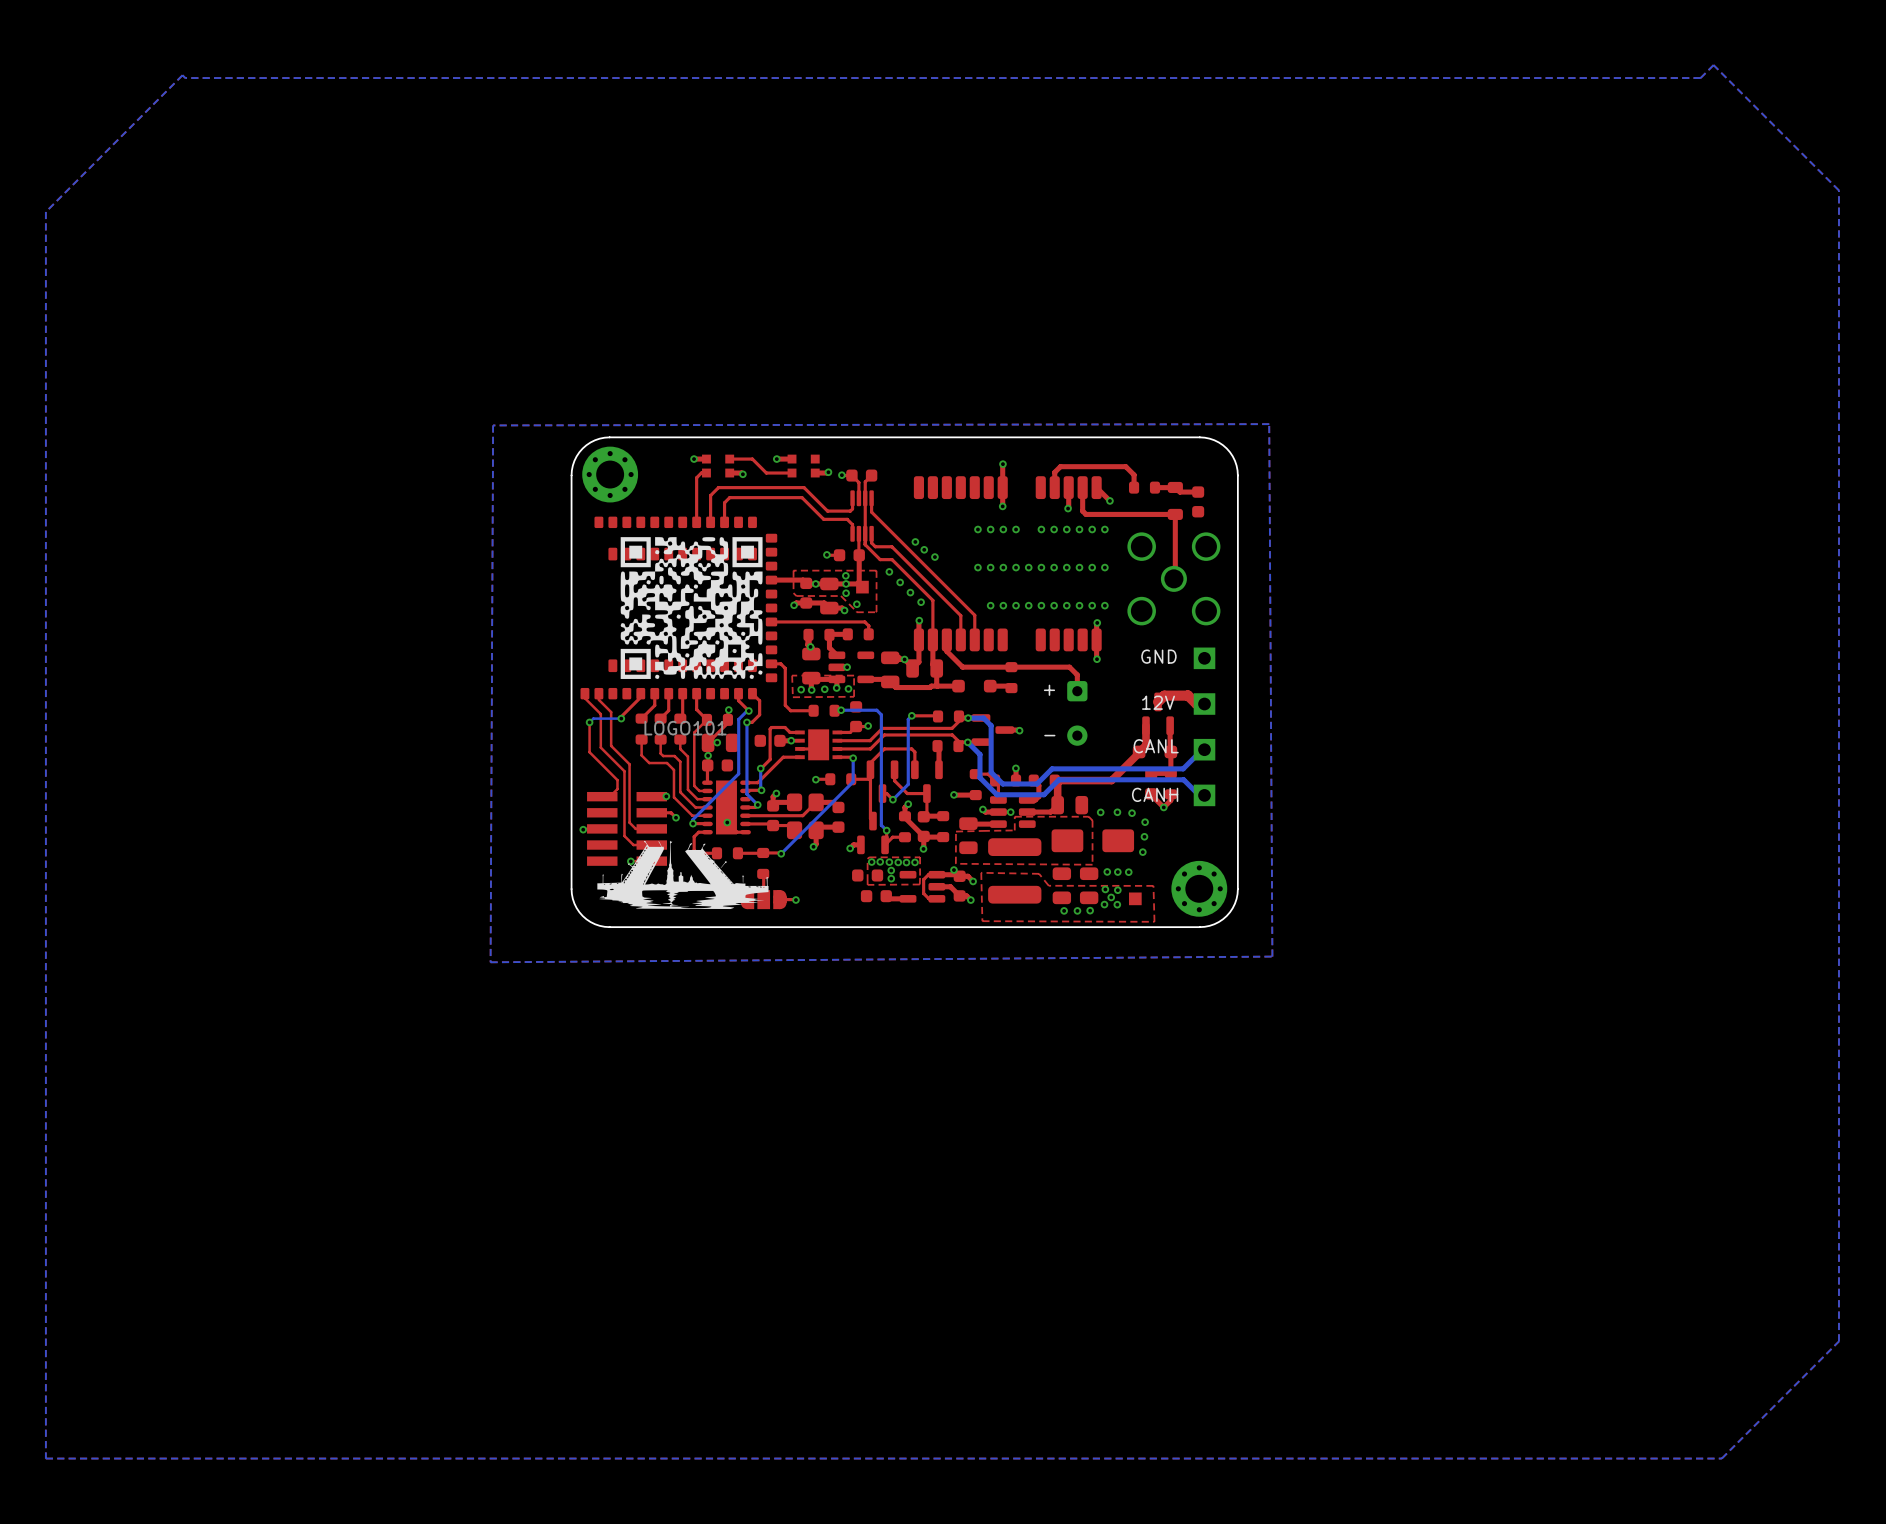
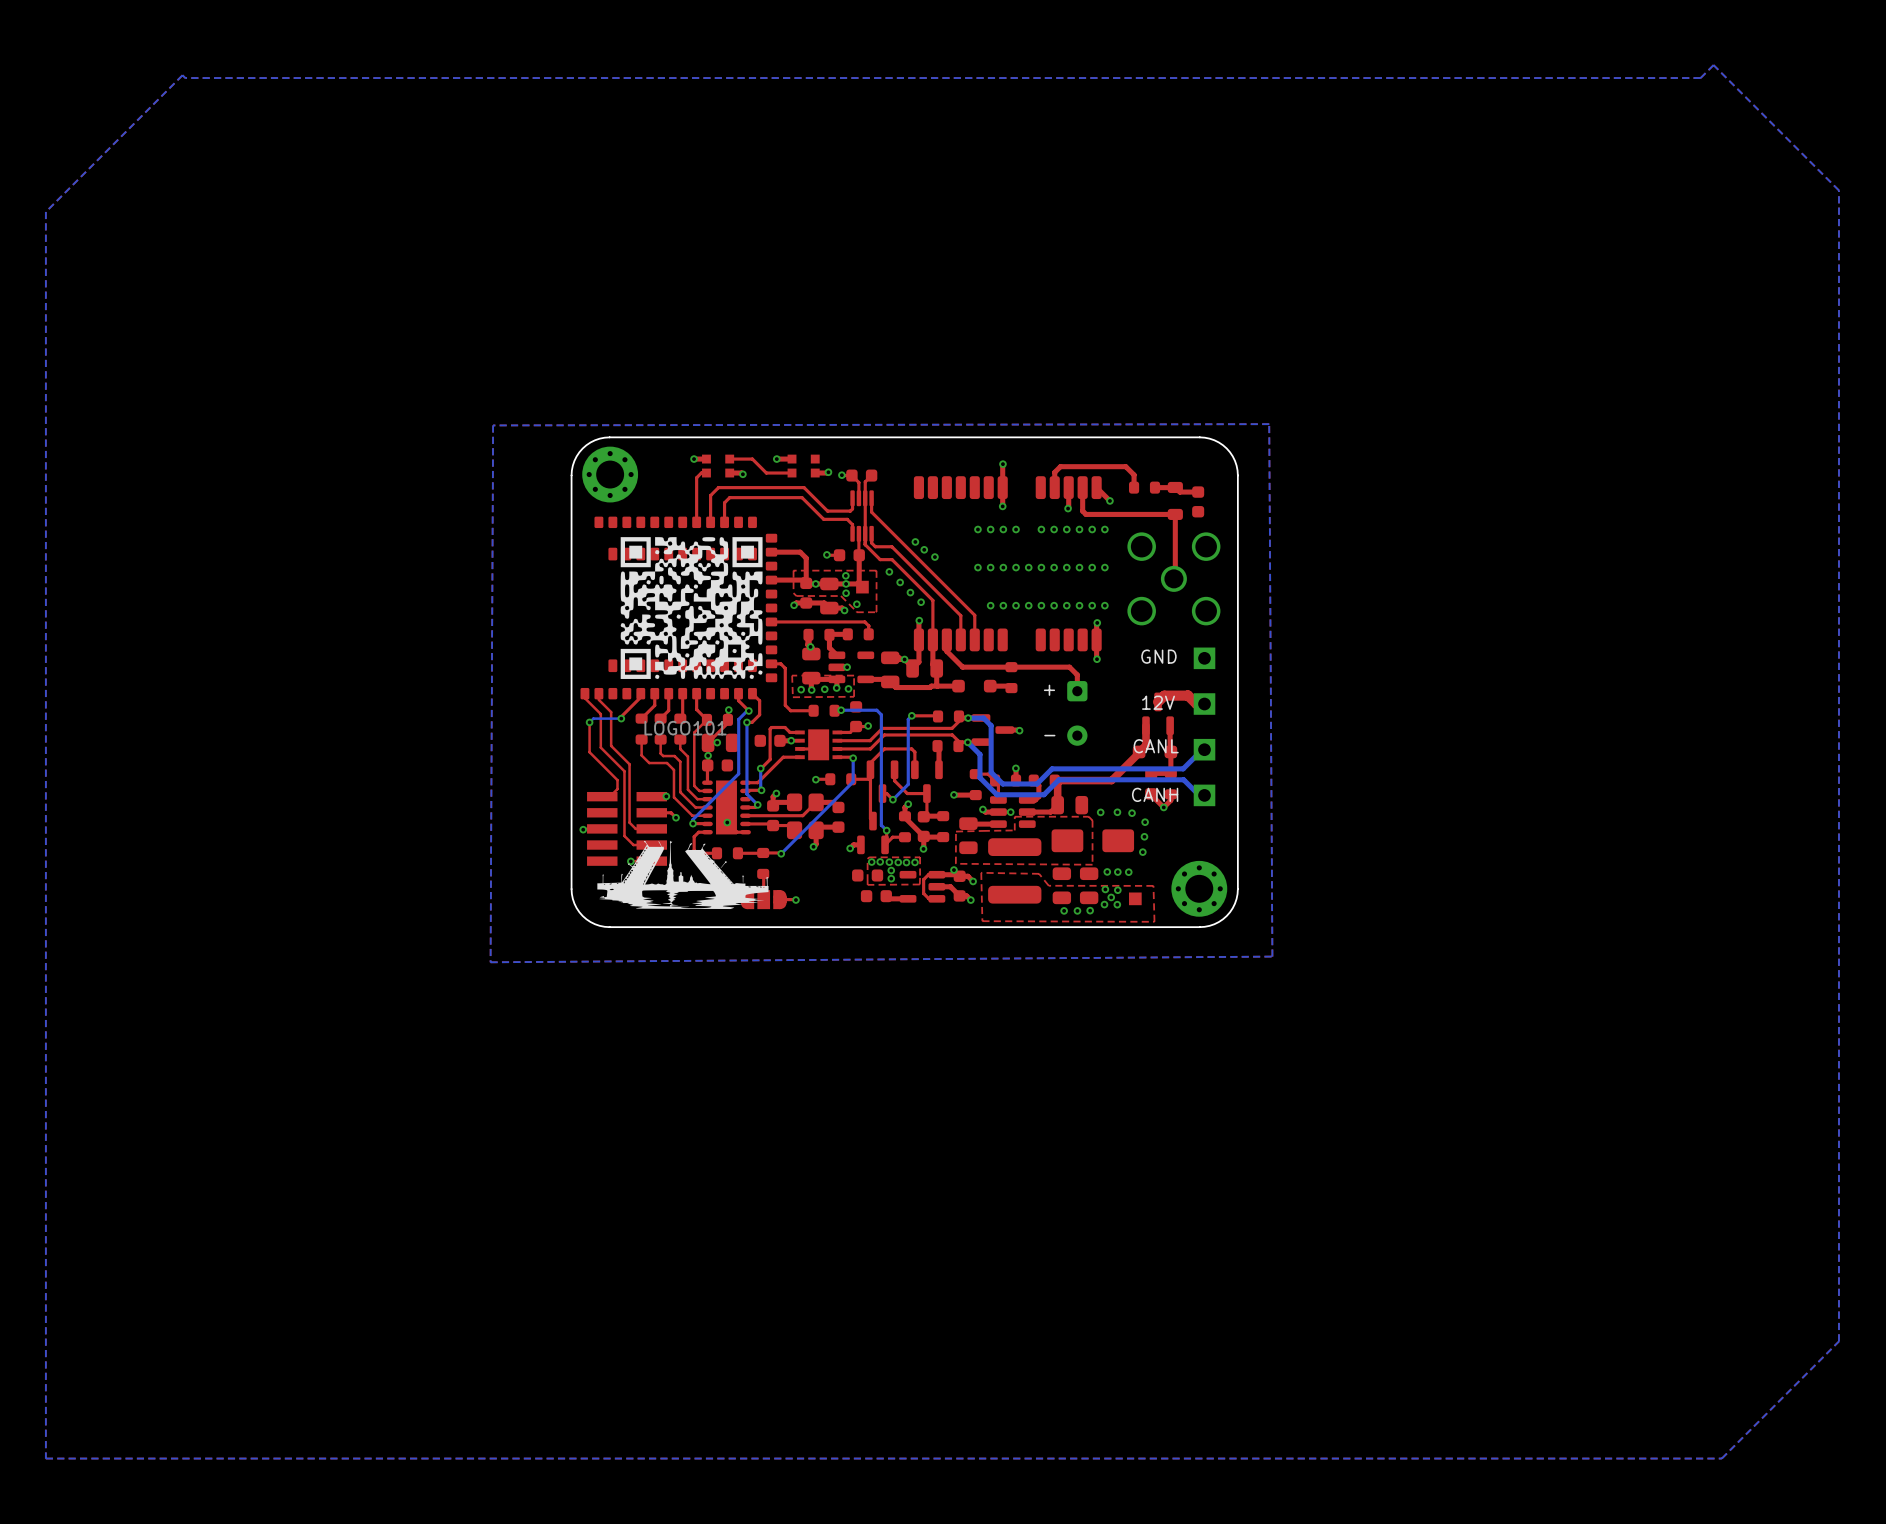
top track: none -> (771, 552) (800, 552) (806, 558) (806, 583)

